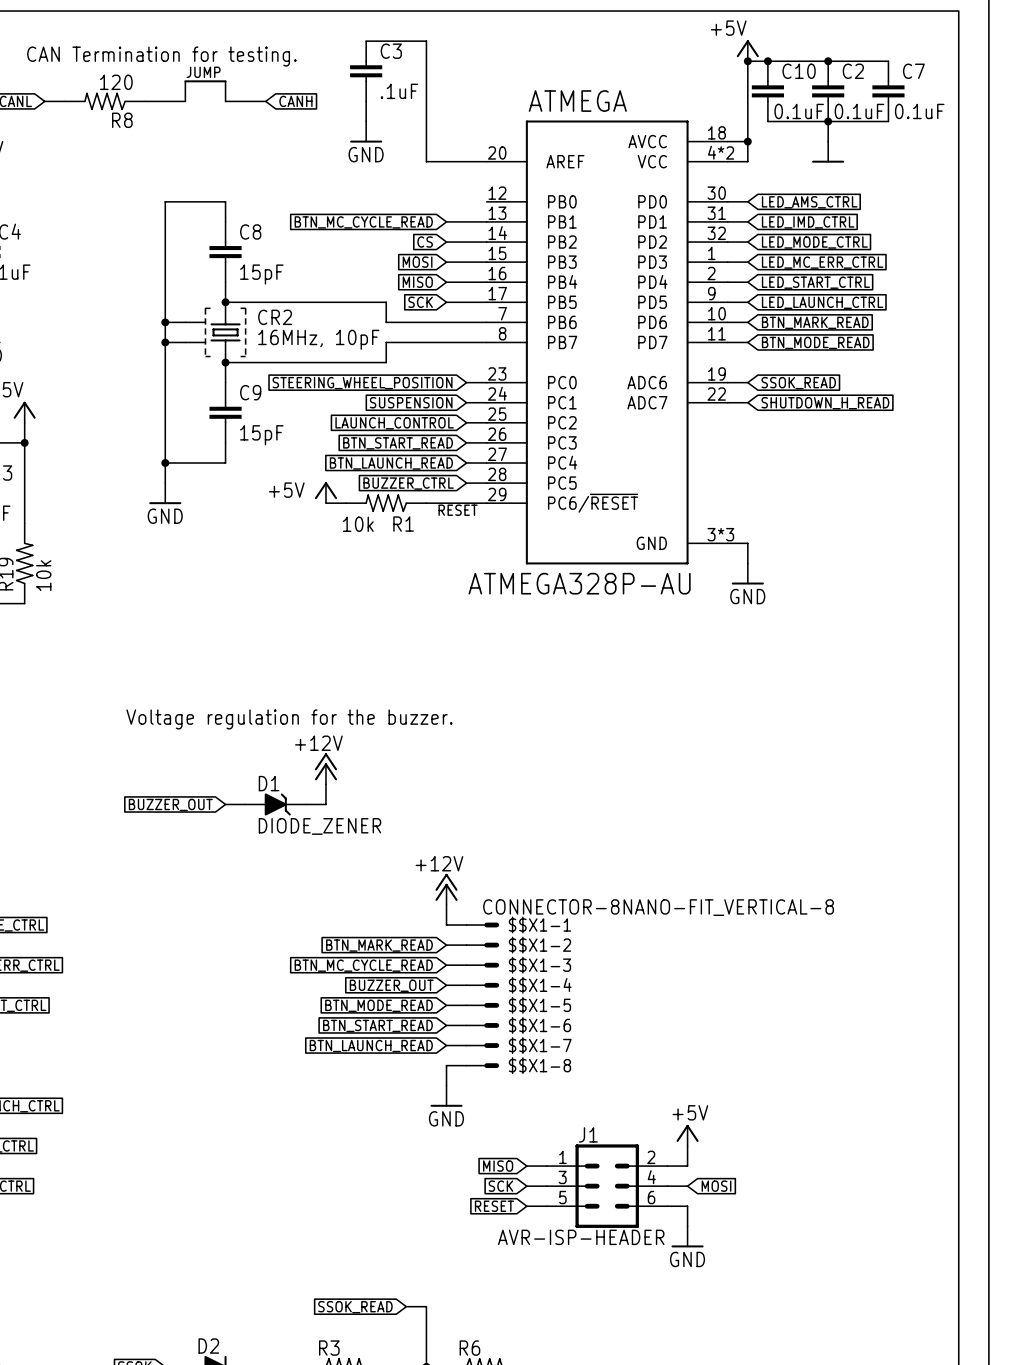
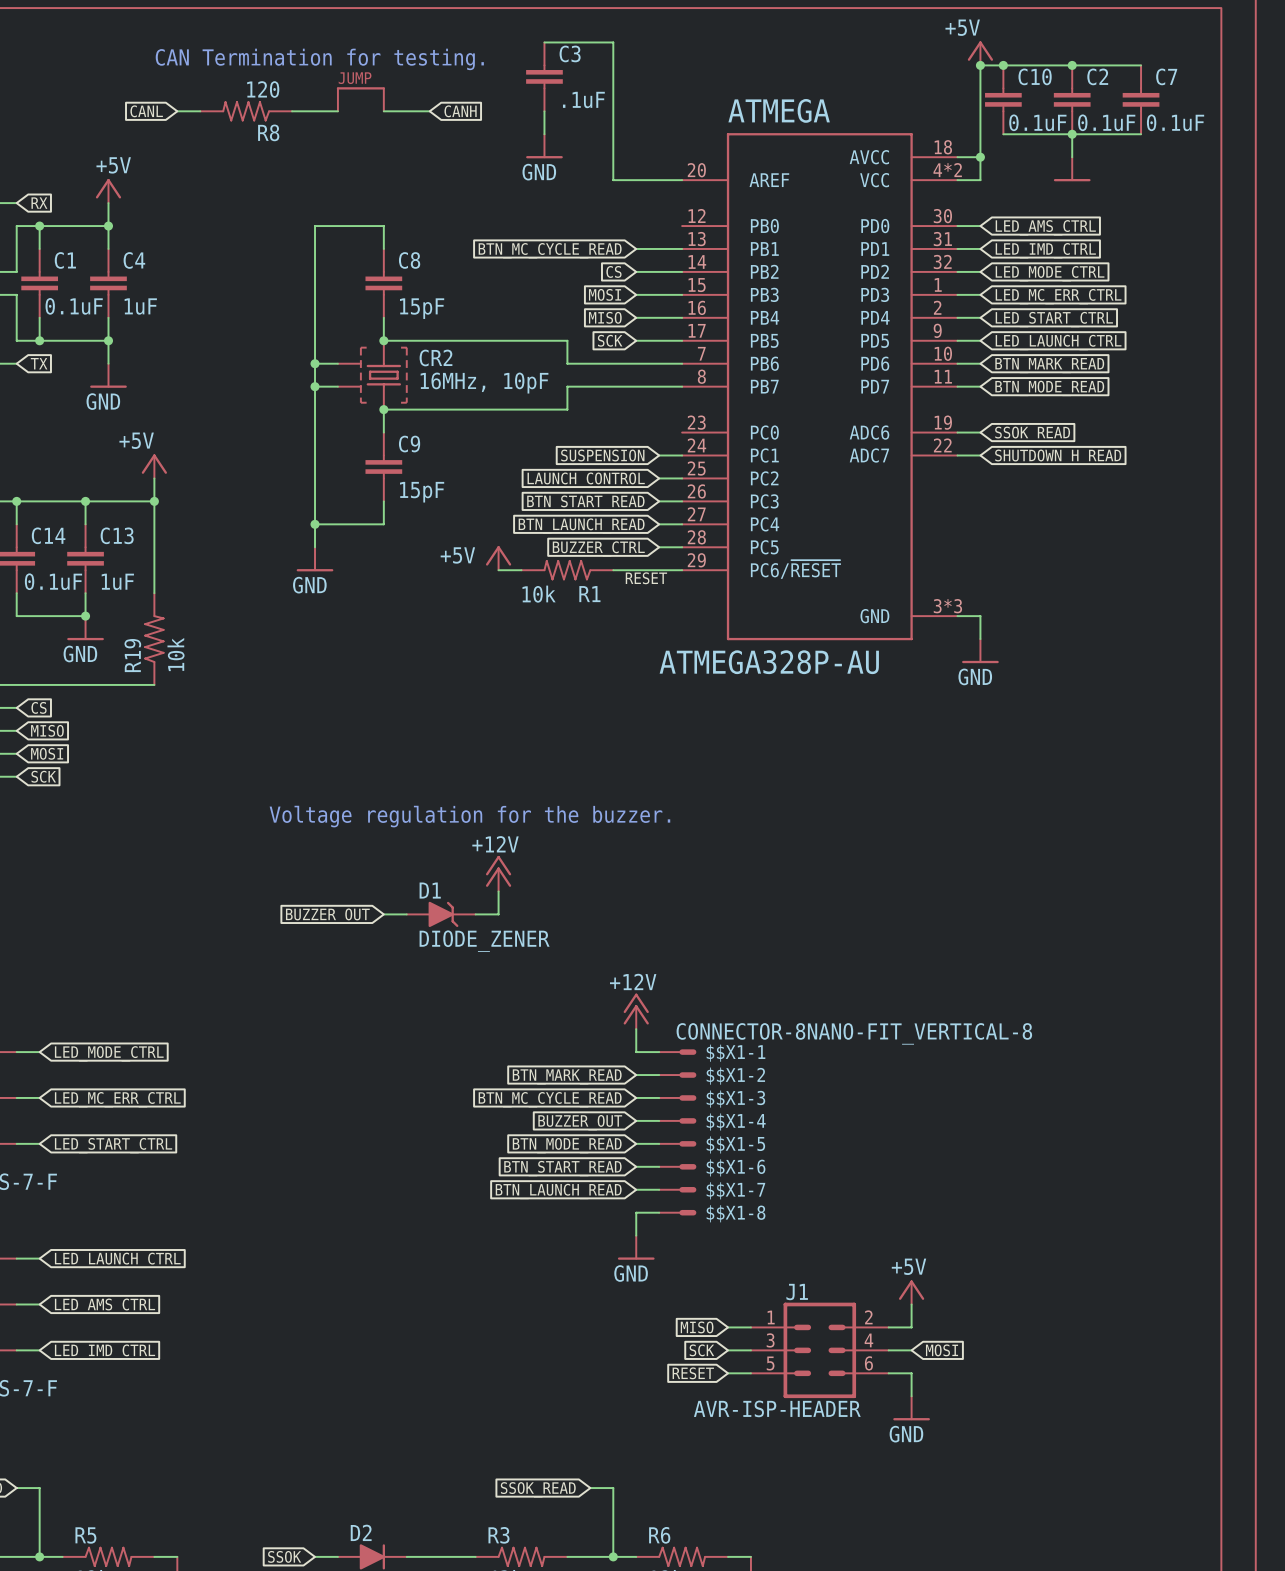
wire: (466, 382) (486, 382) -> none
global label: STEERING_WHEEL_POSITION (362, 383) -> none

